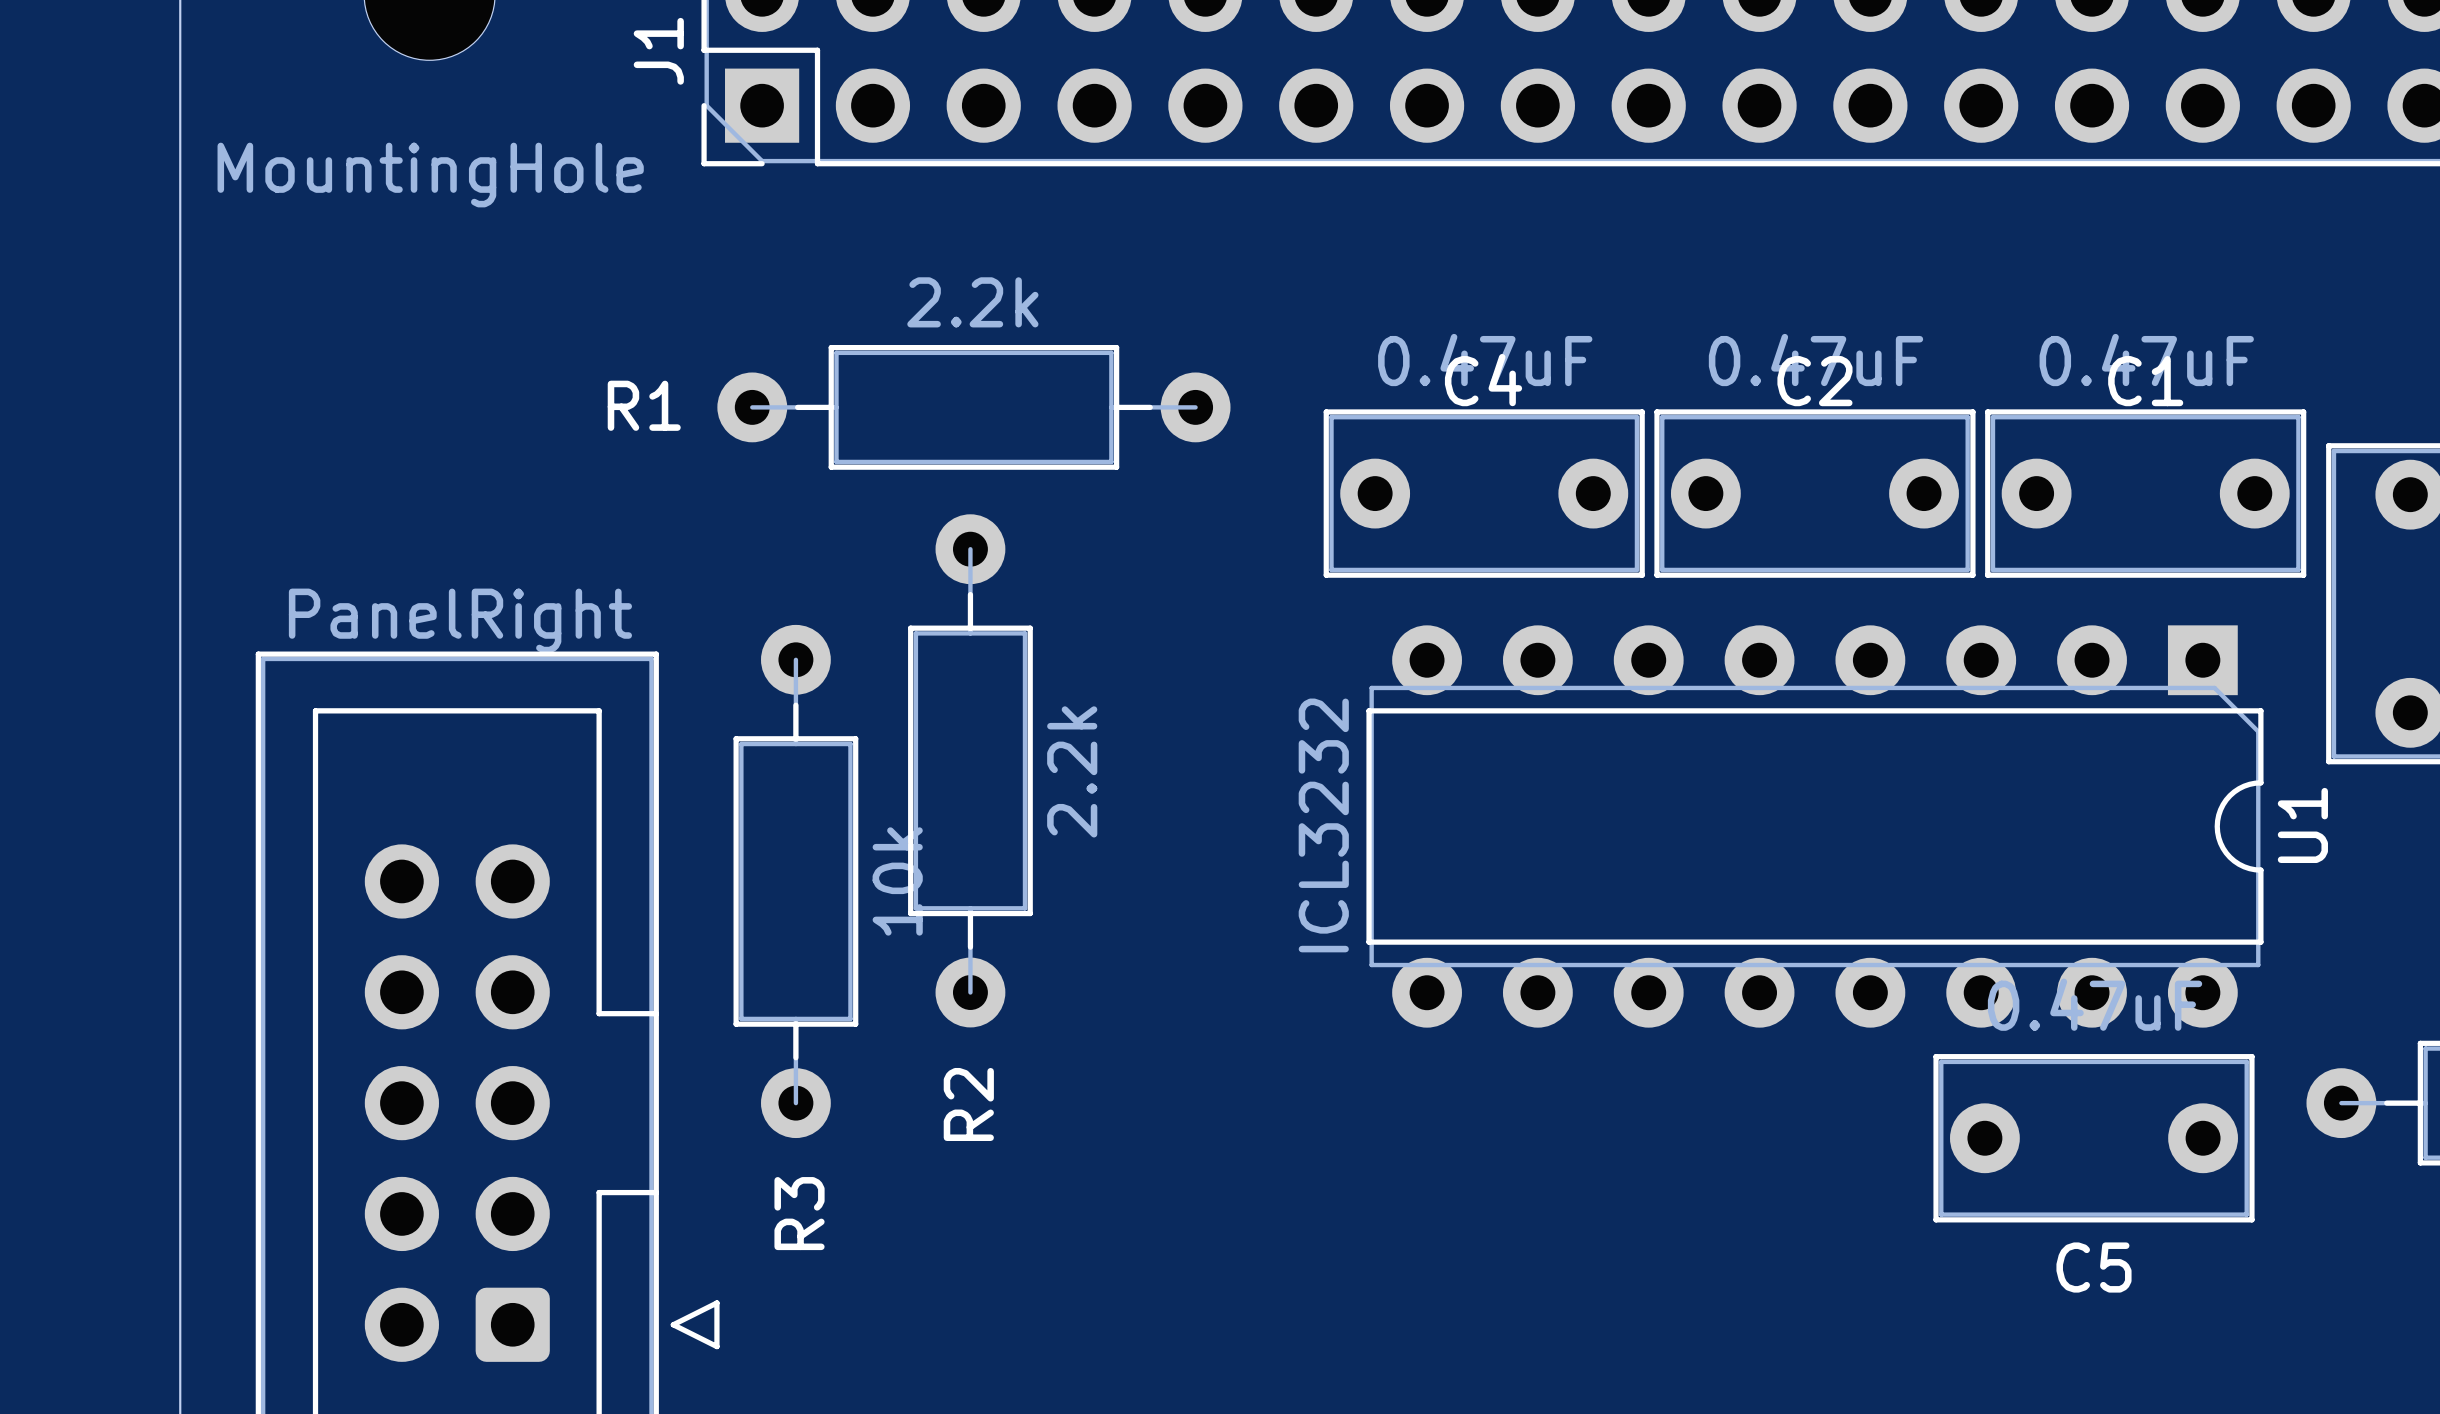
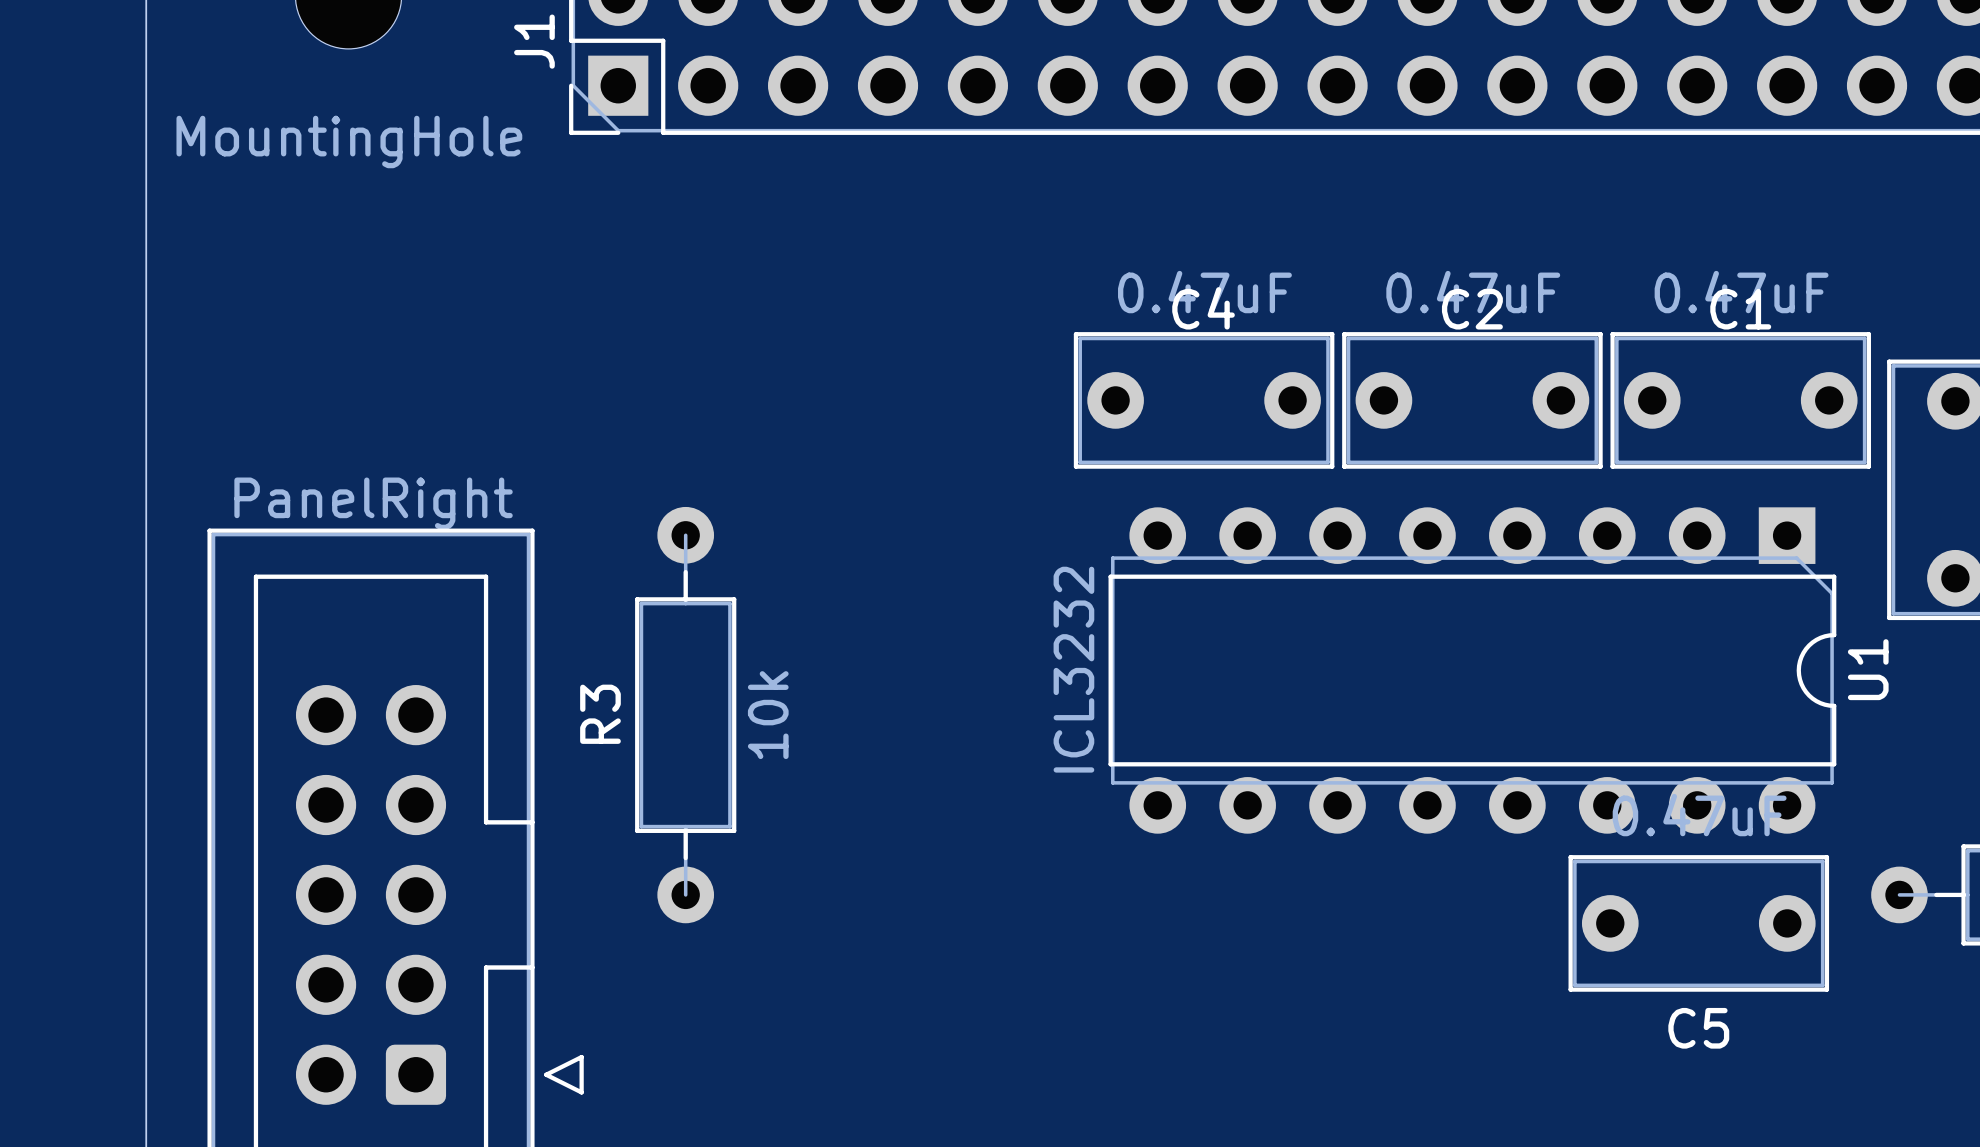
R1: 2.2k (973, 407) -> none
R2: 2.2k (970, 770) -> none
R3 position: (795, 881) -> (685, 715)
R3 name position: R3 (799, 1213) -> R3 (600, 714)

